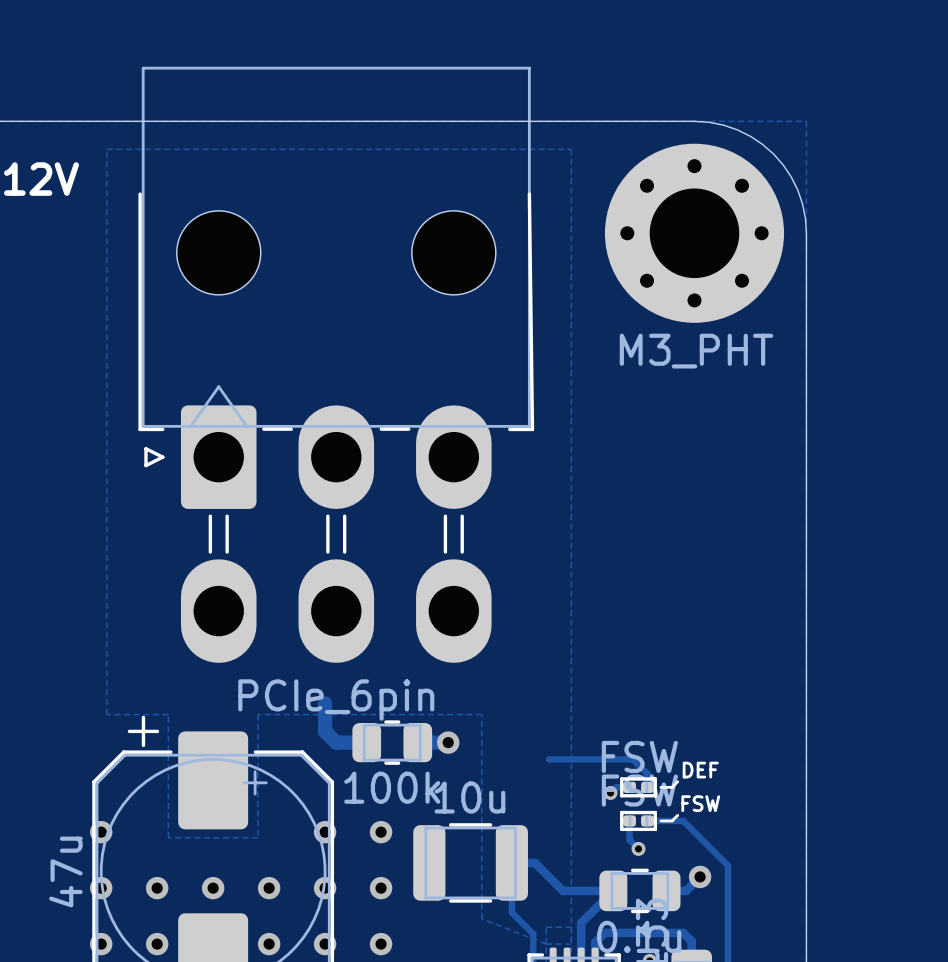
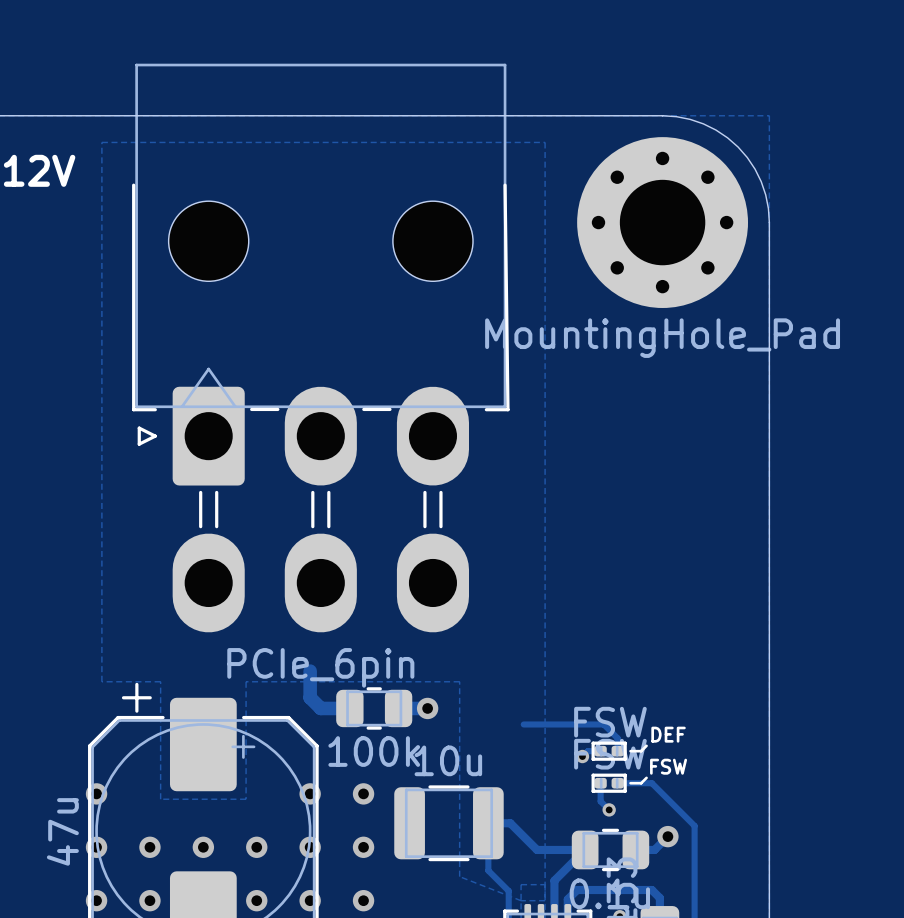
part value: M3_PHT (696, 351) -> MountingHole_Pad (662, 338)

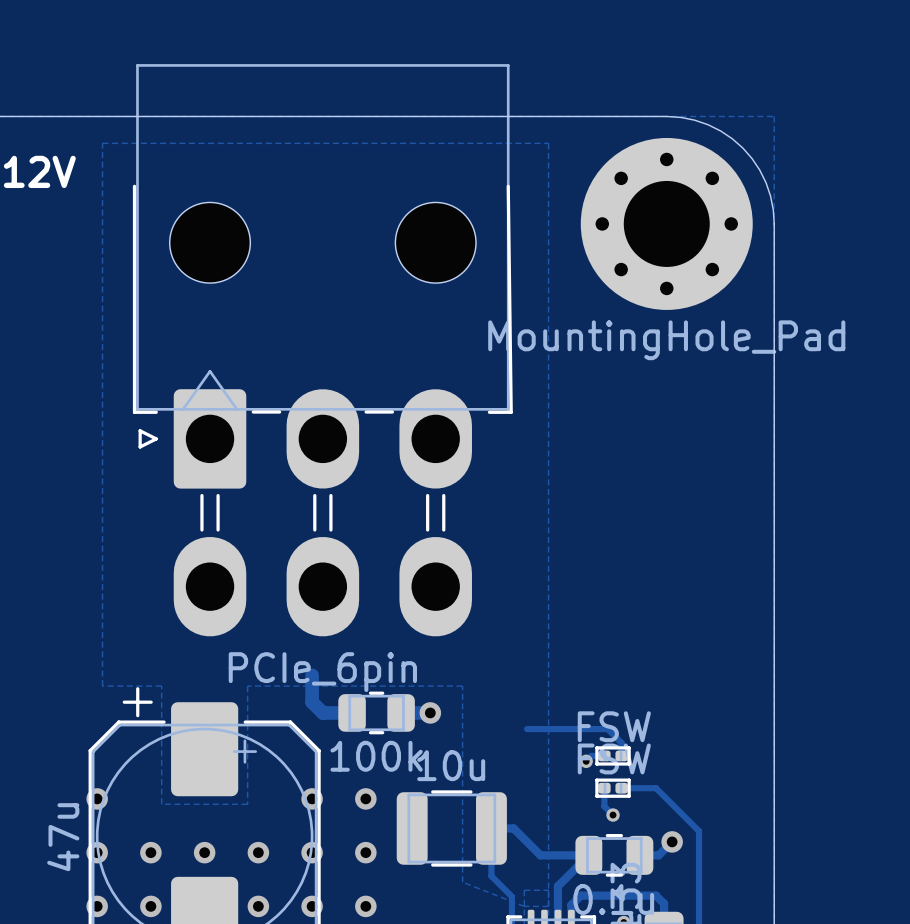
text: DEF (668, 734) -> none
line: (646, 745) (641, 751) (630, 751) -> none
text: FSW (668, 766) -> none
line: (646, 777) (641, 783) (630, 783) -> none

